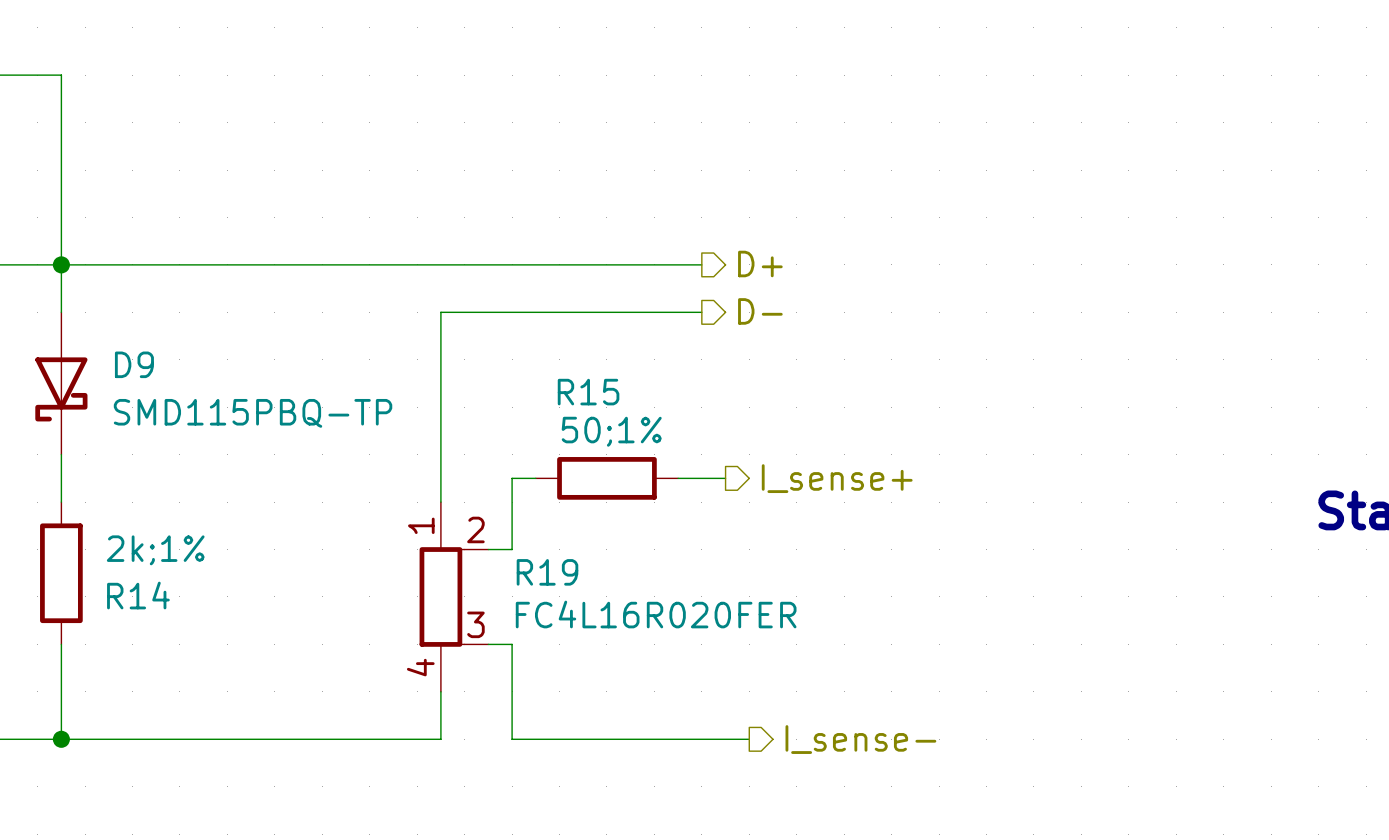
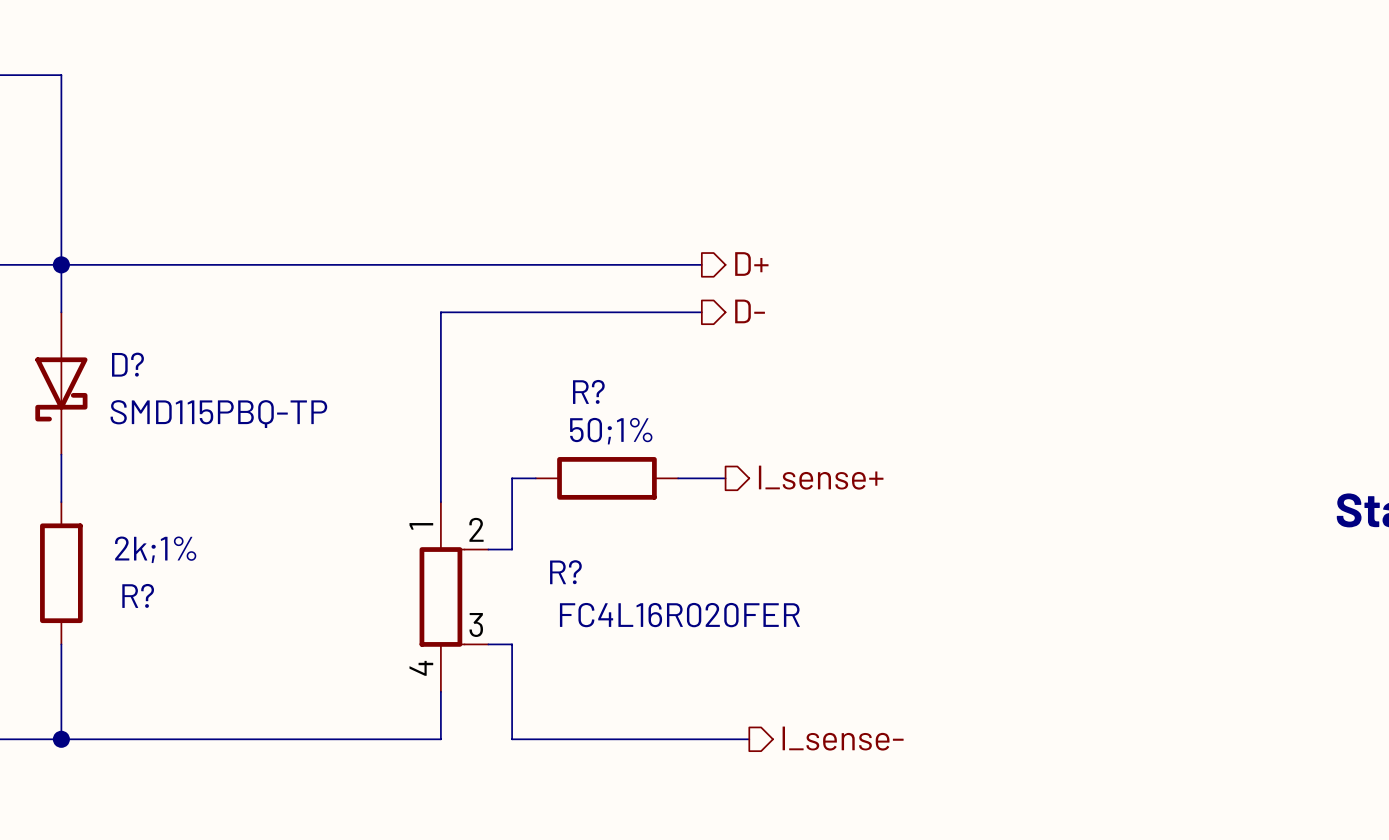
D9 name: D9 (134, 364) -> D? (127, 364)
R15 name: R15 (588, 392) -> R? (588, 391)
R19 name: R19 (547, 572) -> R? (565, 572)
R14 name: R14 (138, 595) -> R? (138, 595)

